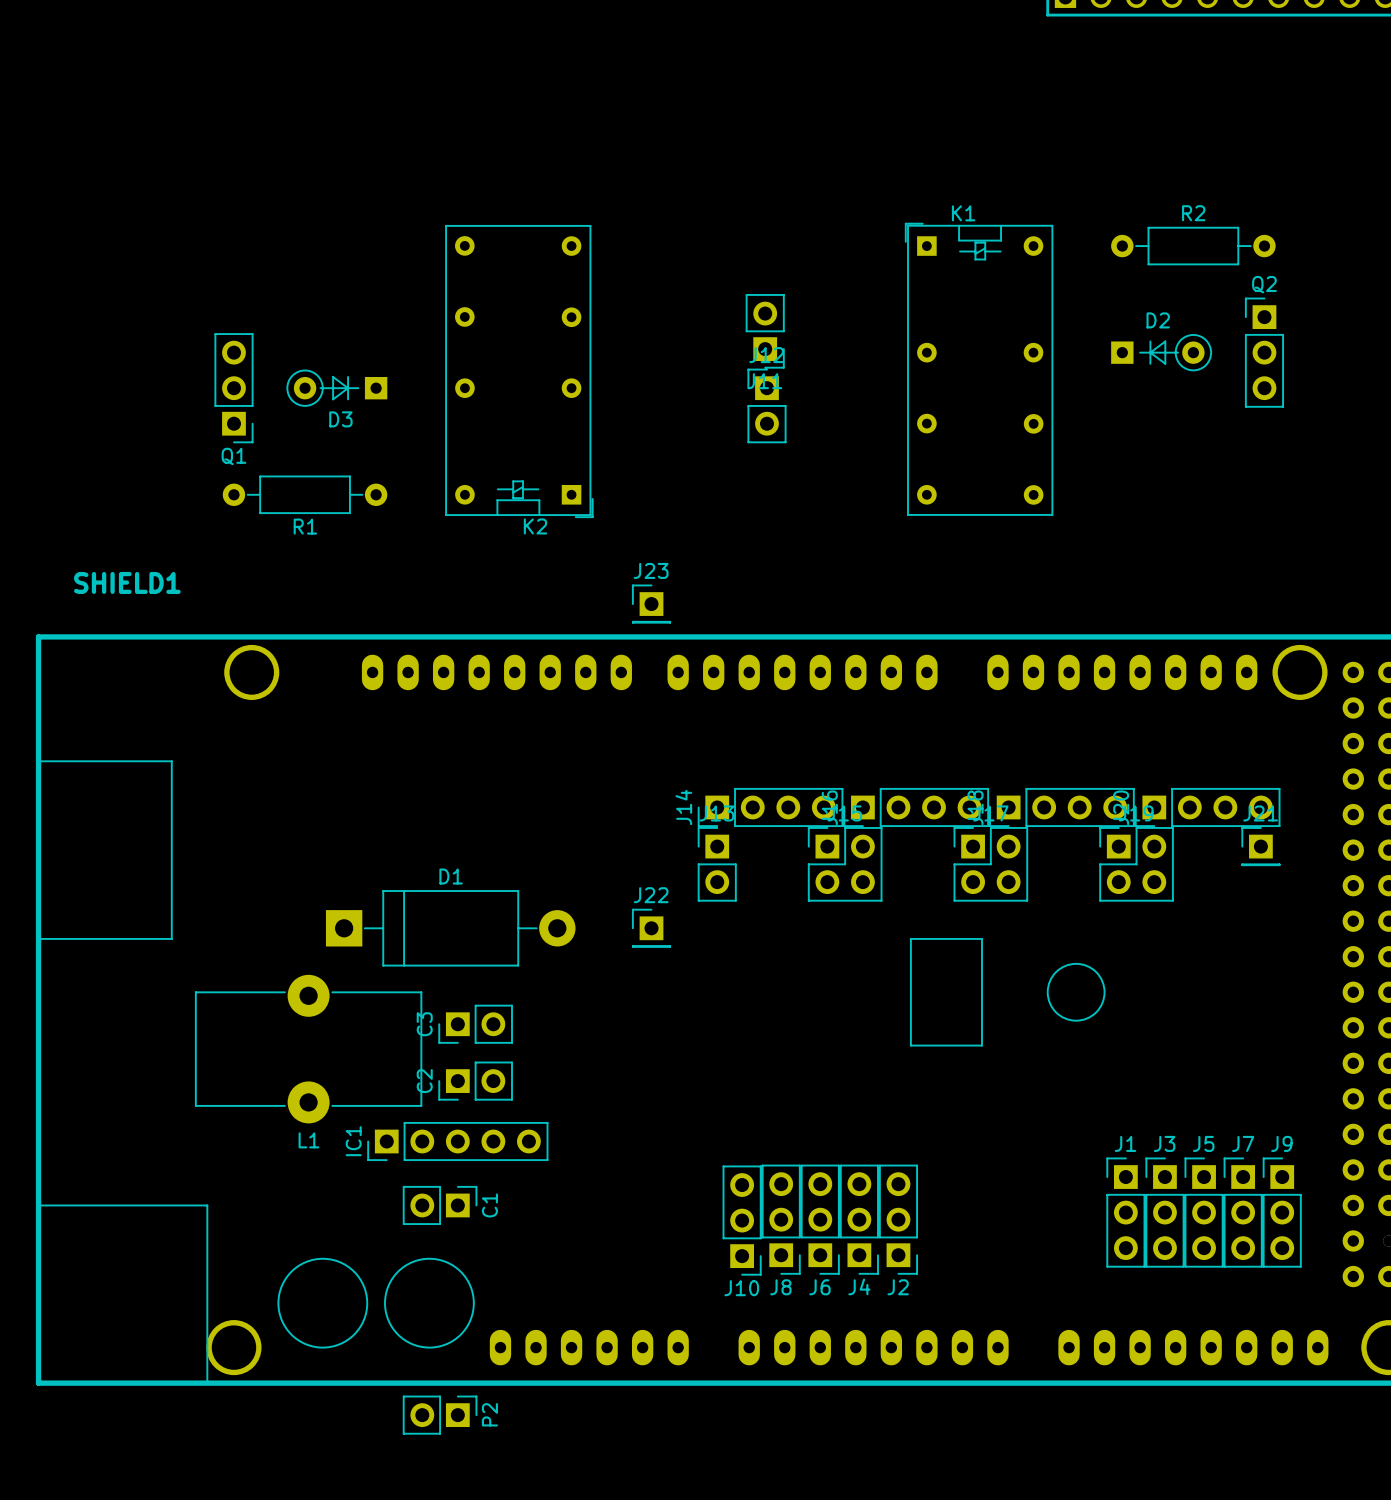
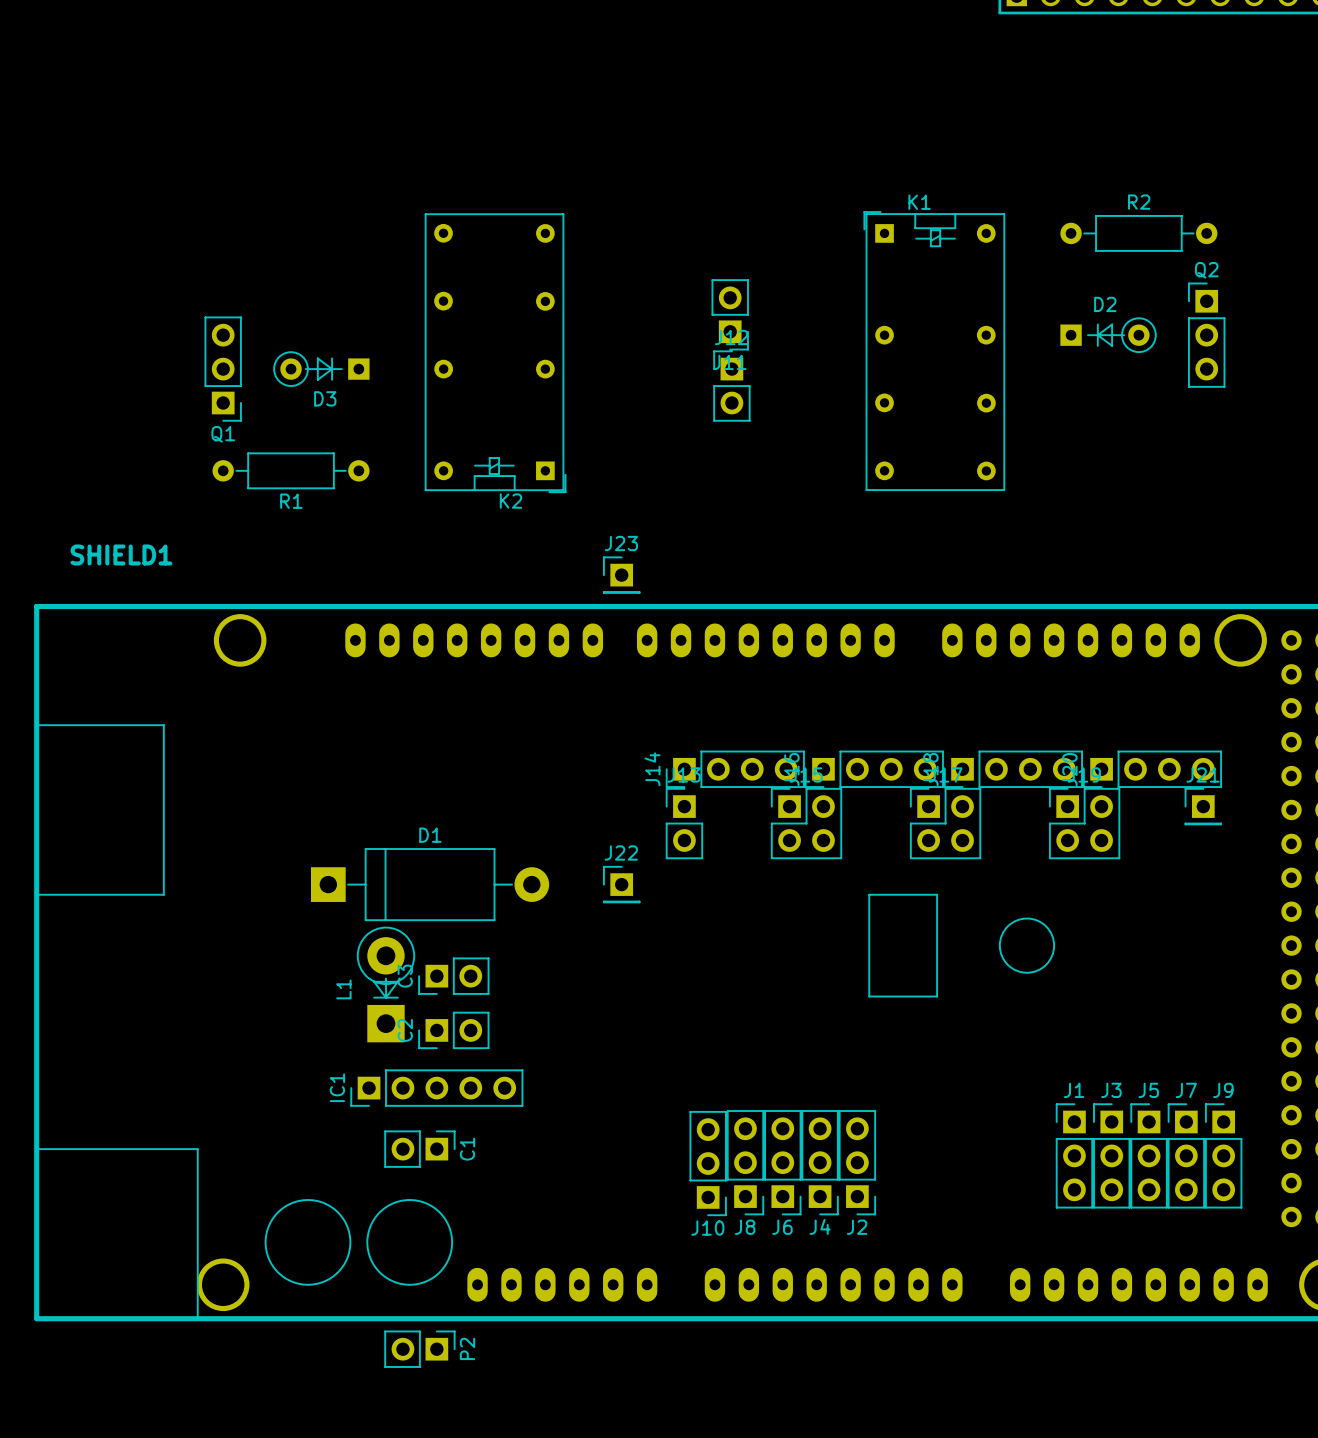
L1 footprint: [195, 974, 423, 1124] -> [356, 926, 416, 1043]
L1 name position: L1 (308, 1140) -> L1 (343, 989)

